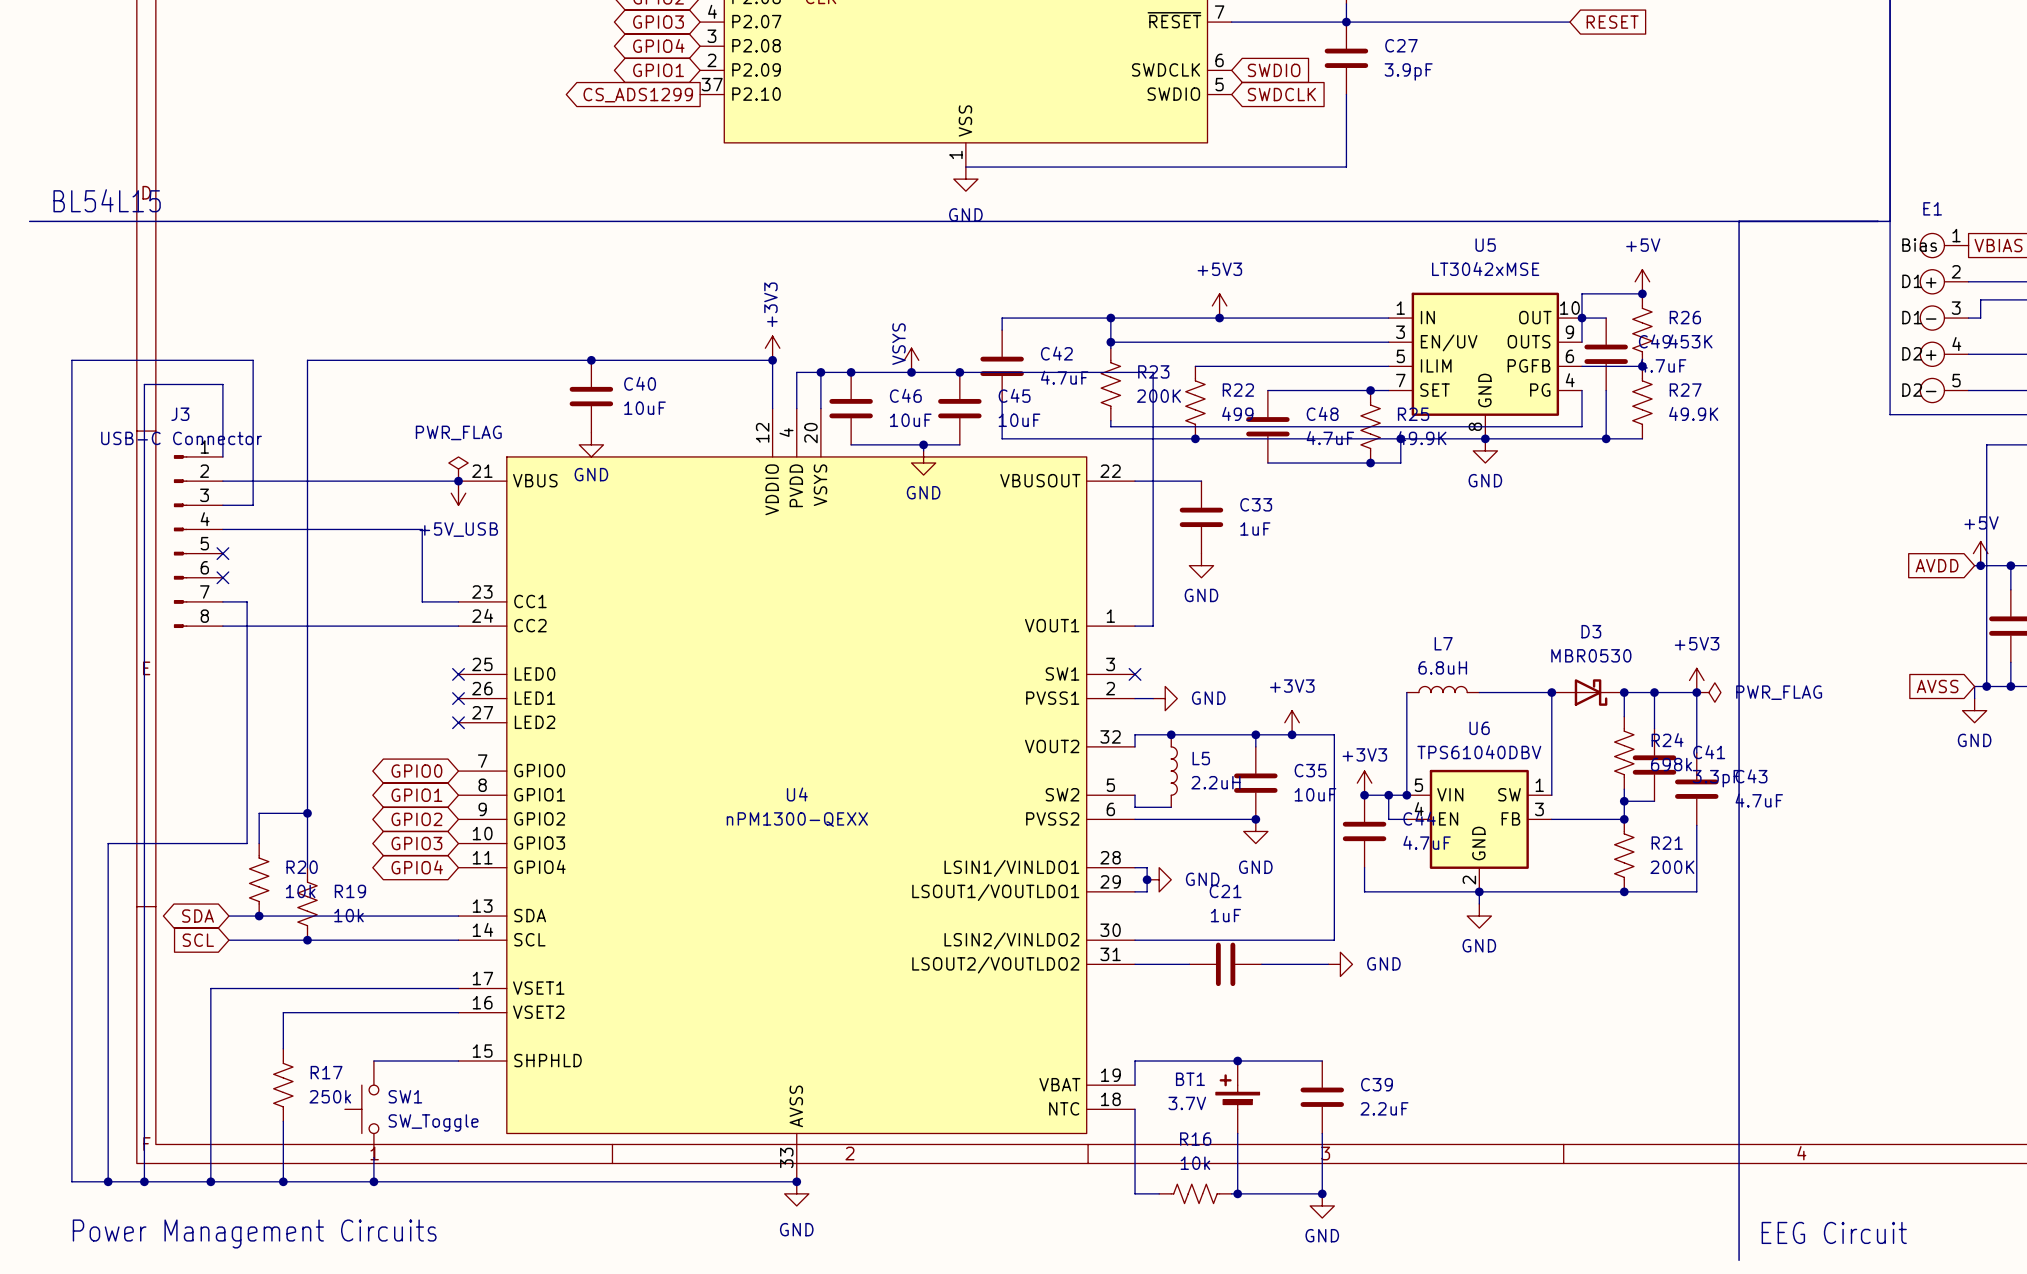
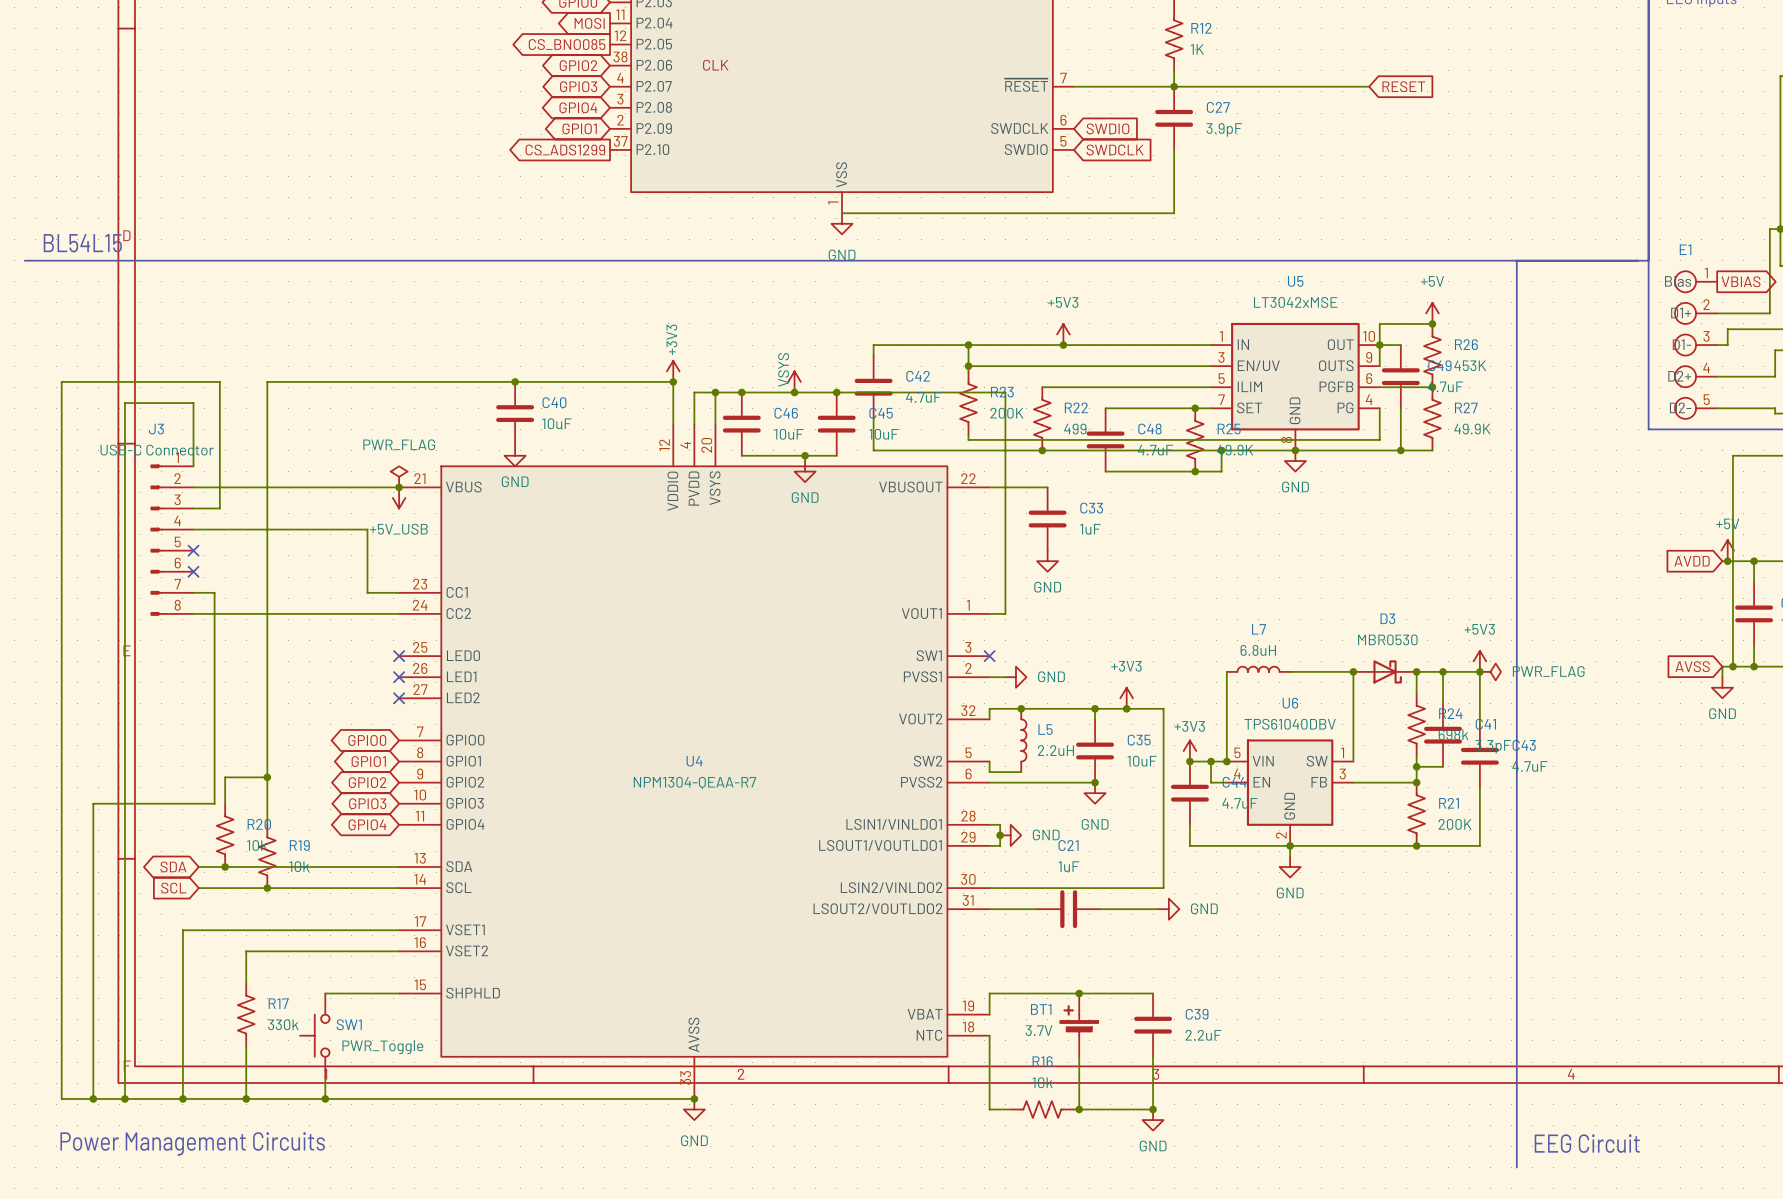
U4 value: nPM1300-QEXX (797, 819) -> NPM1304-QEAA-R7 (694, 783)
R17 value: 250k (330, 1096) -> 330k (283, 1024)
SW1 value: SW_Toggle (433, 1122) -> PWR_Toggle (382, 1047)

